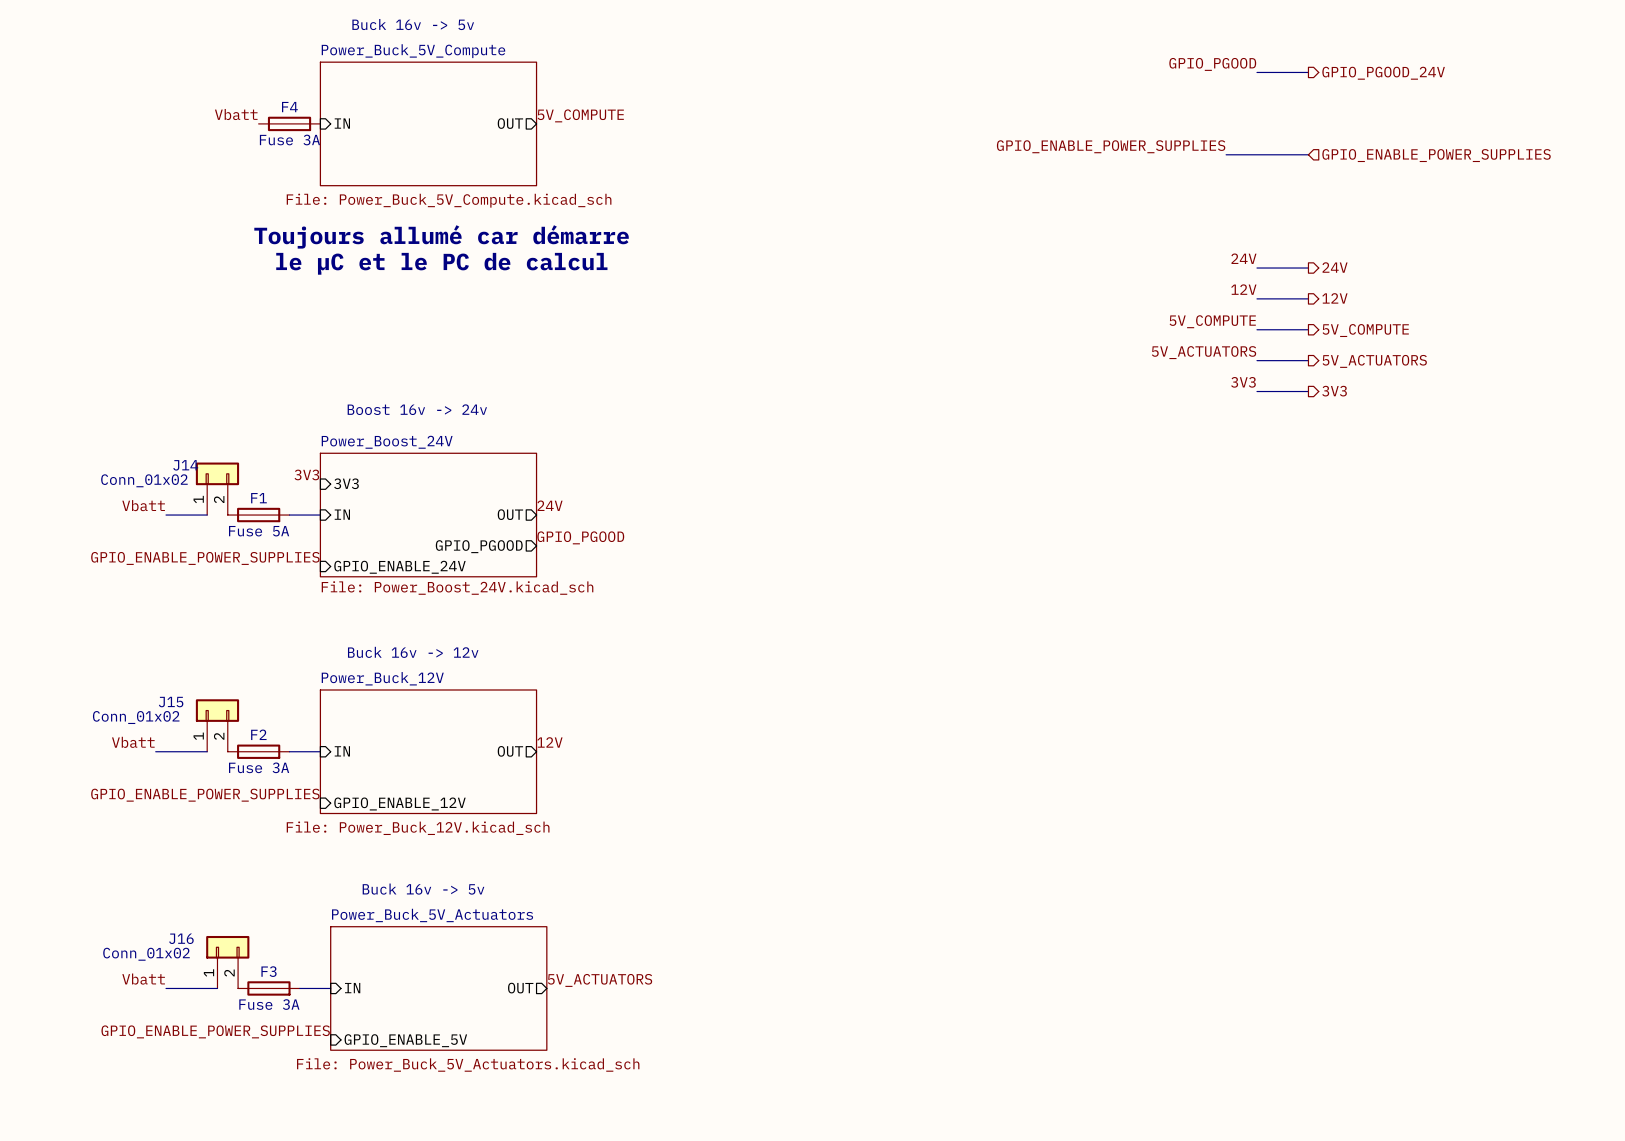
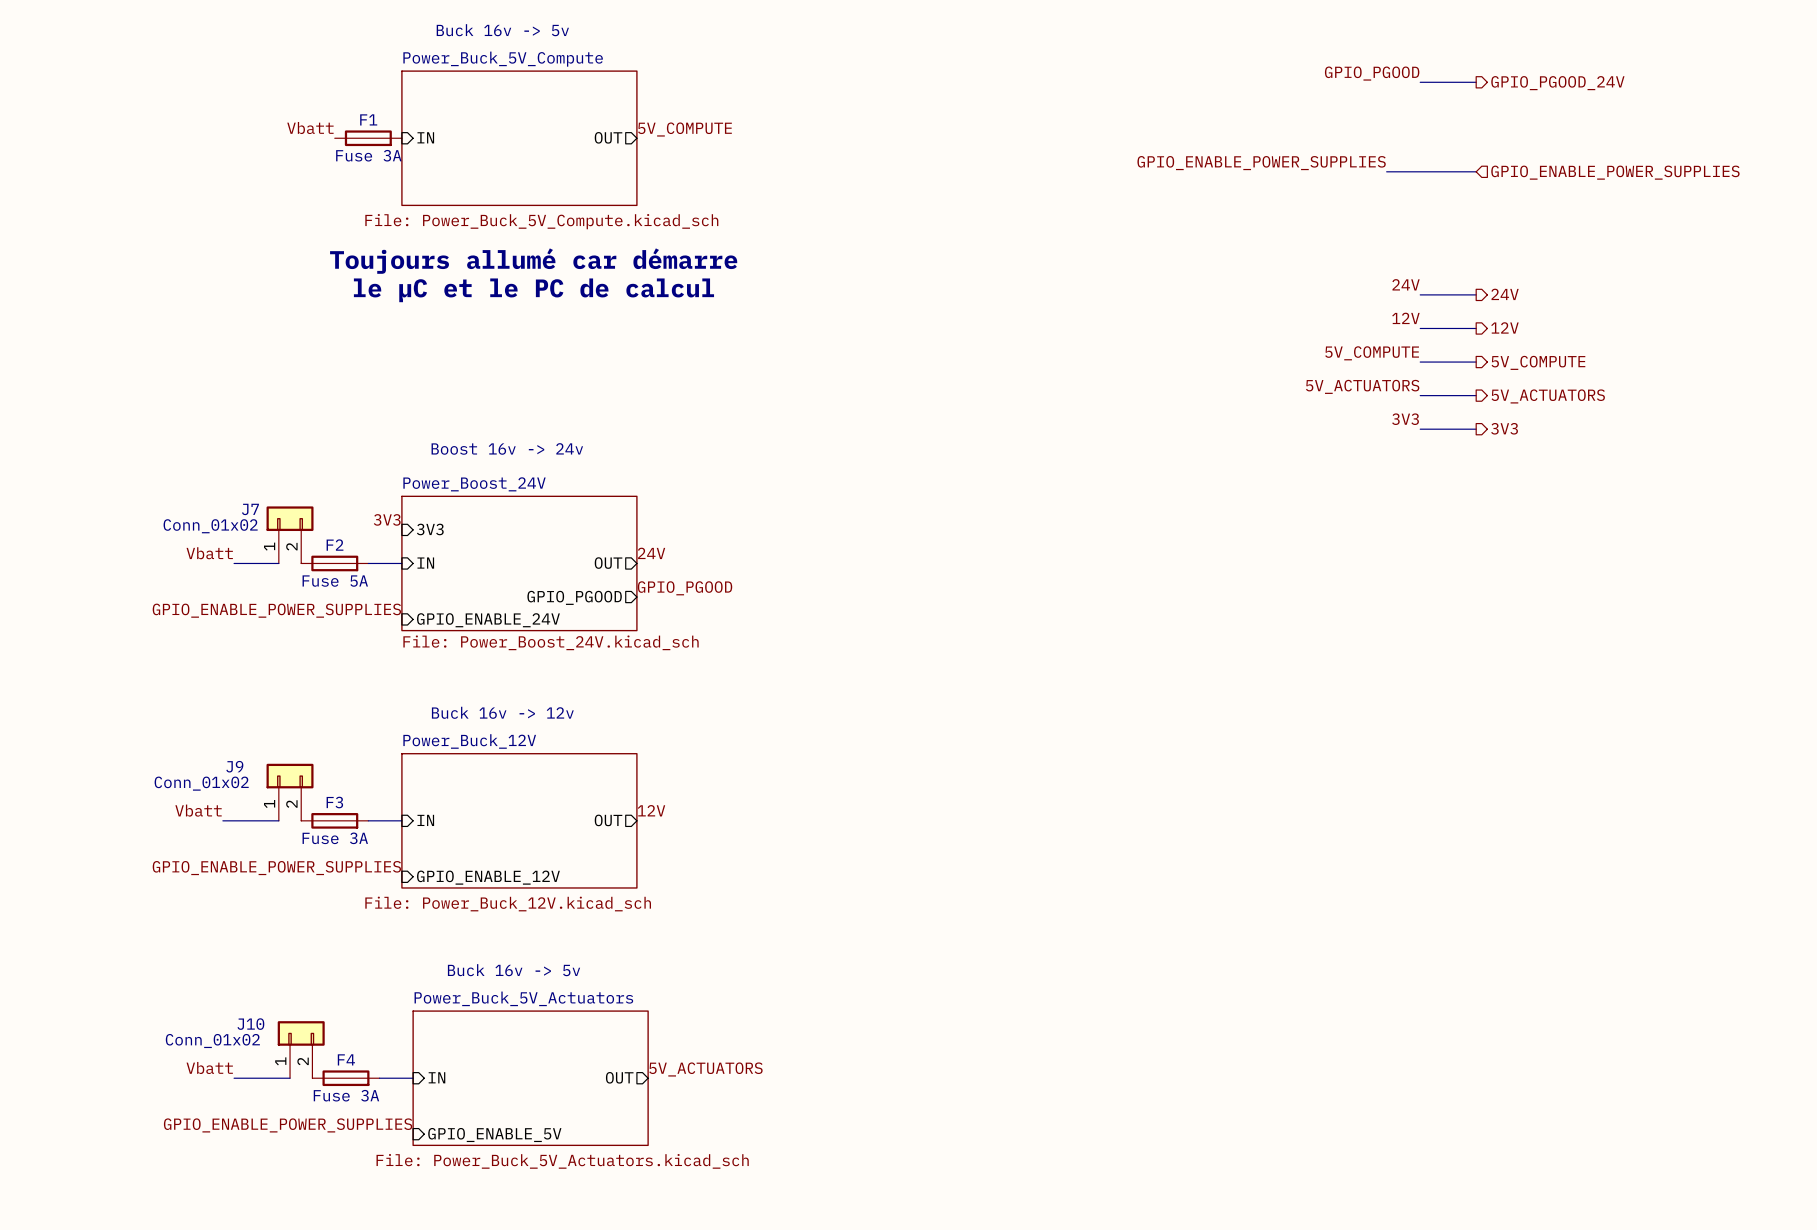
F4 name: F4 (289, 107) -> F1 (368, 119)
J14 name: J14 (185, 465) -> J7 (250, 509)
F1 name: F1 (258, 498) -> F2 (335, 545)
J15 name: J15 (171, 702) -> J9 (234, 766)
F2 name: F2 (258, 734) -> F3 (334, 802)
J16 name: J16 (181, 938) -> J10 (250, 1024)
F3 name: F3 (269, 971) -> F4 (346, 1059)

